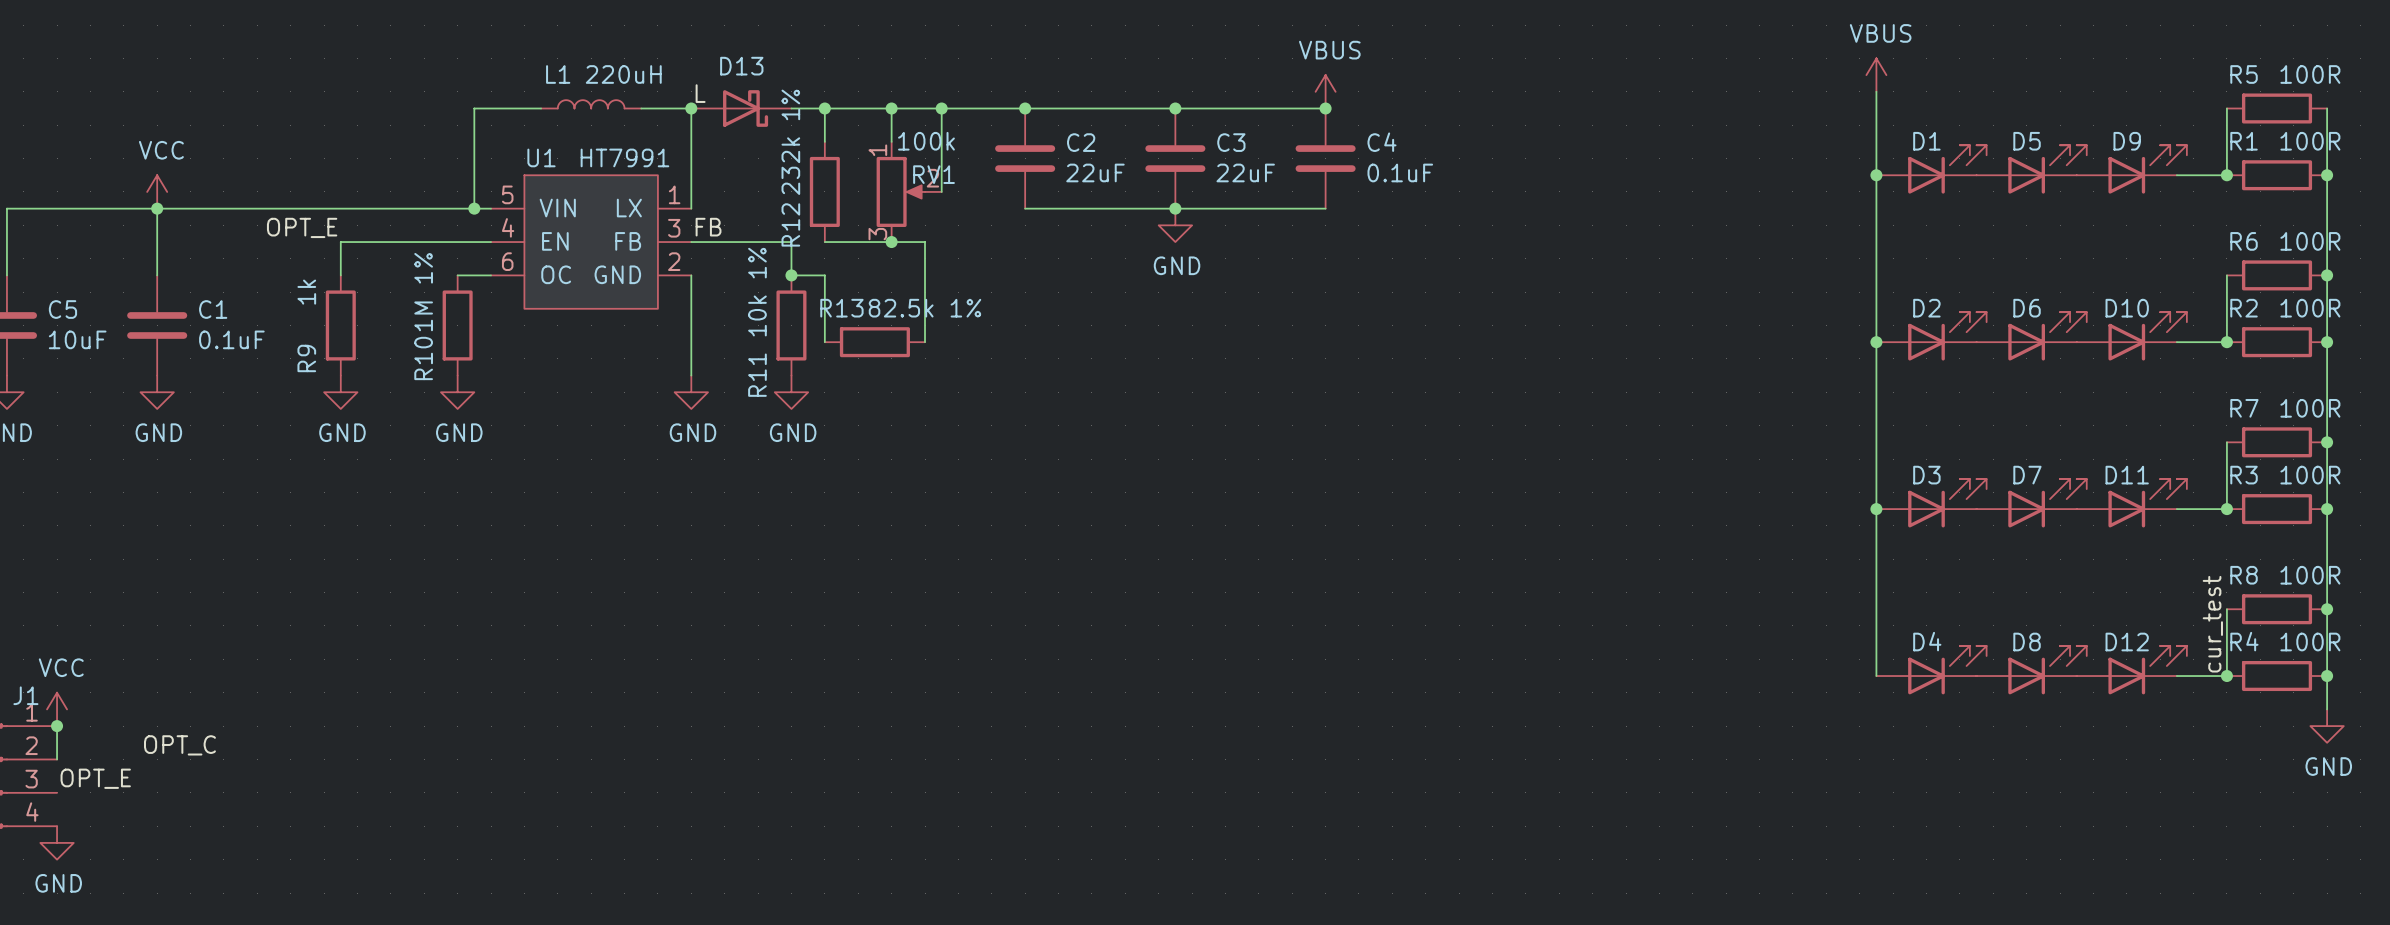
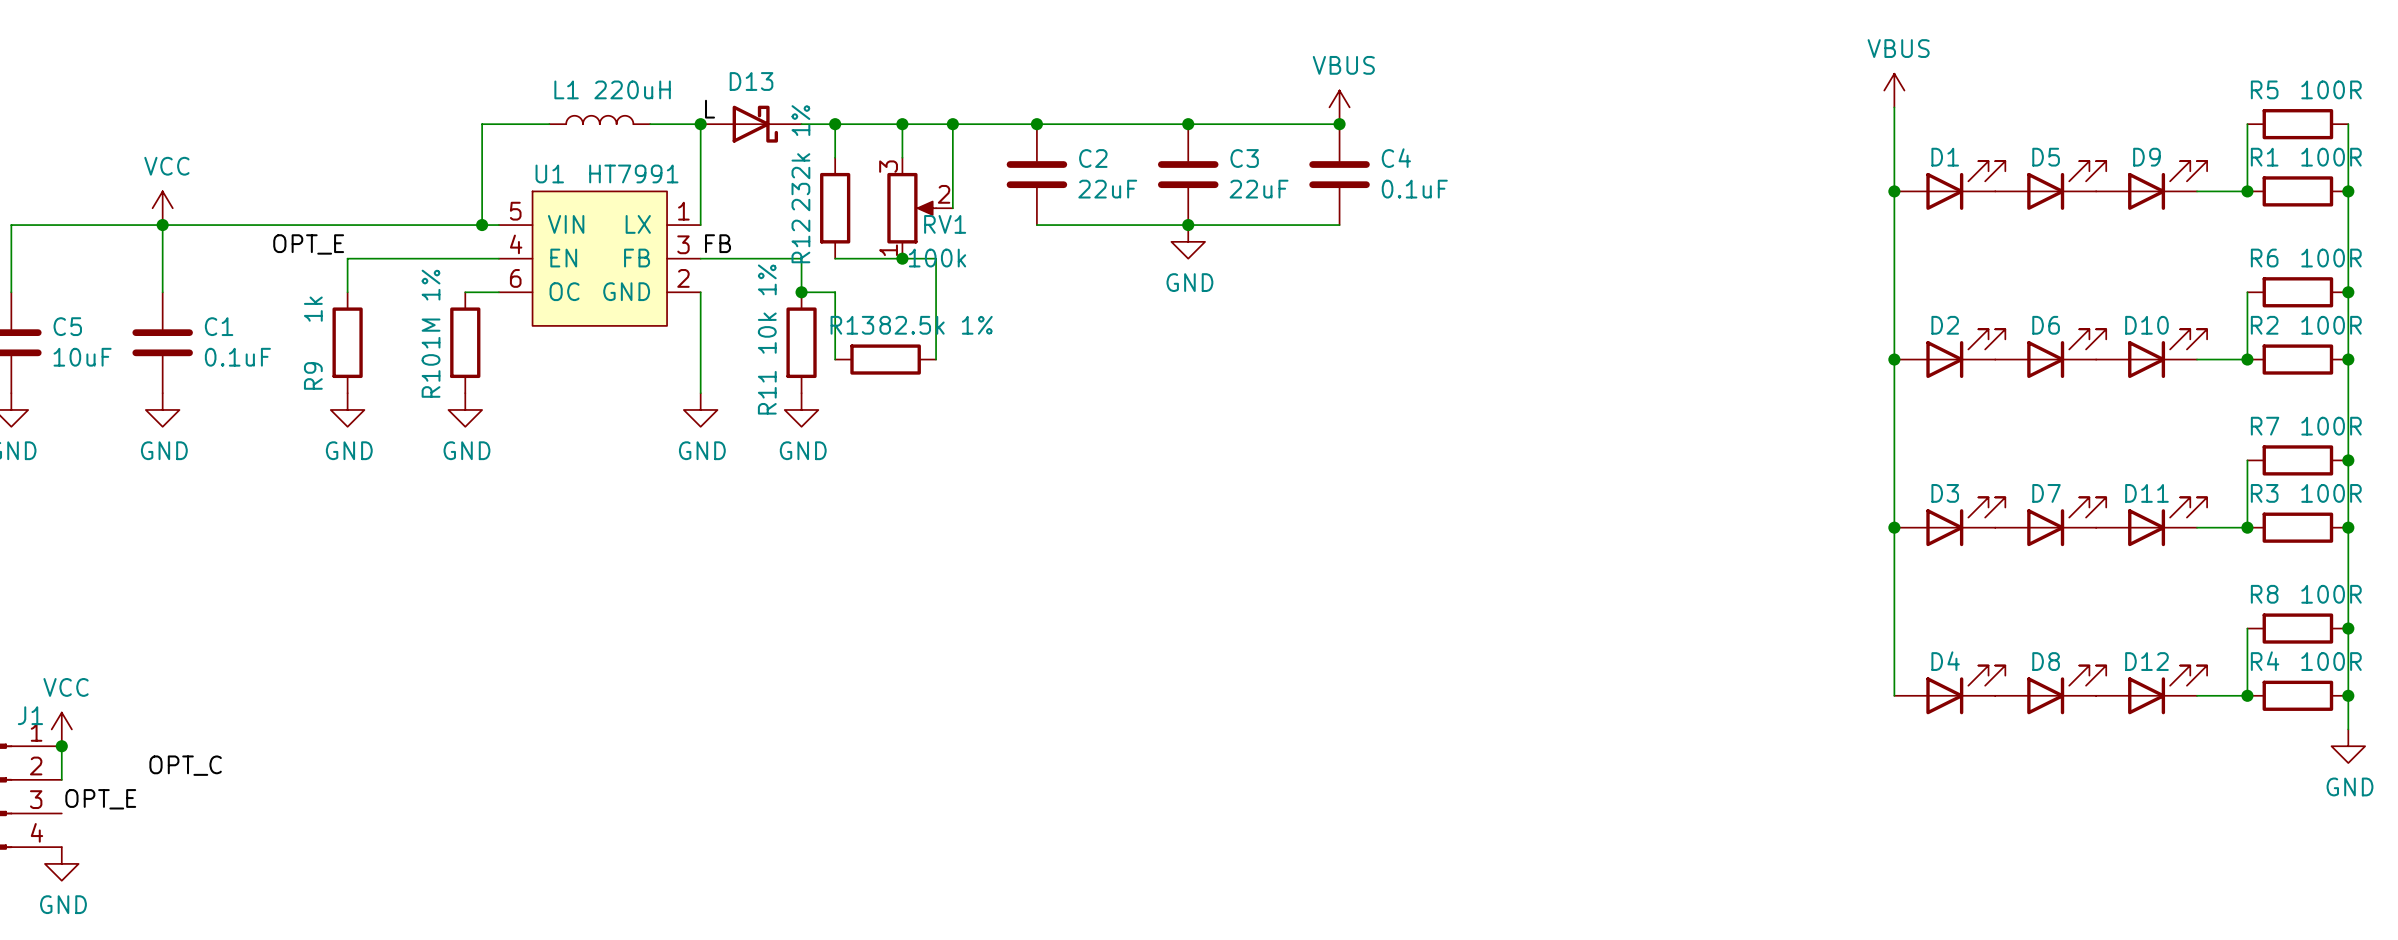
RV1 flip: as is (900, 191) -> up-down (911, 208)
label: cur_test (2212, 624) -> none

